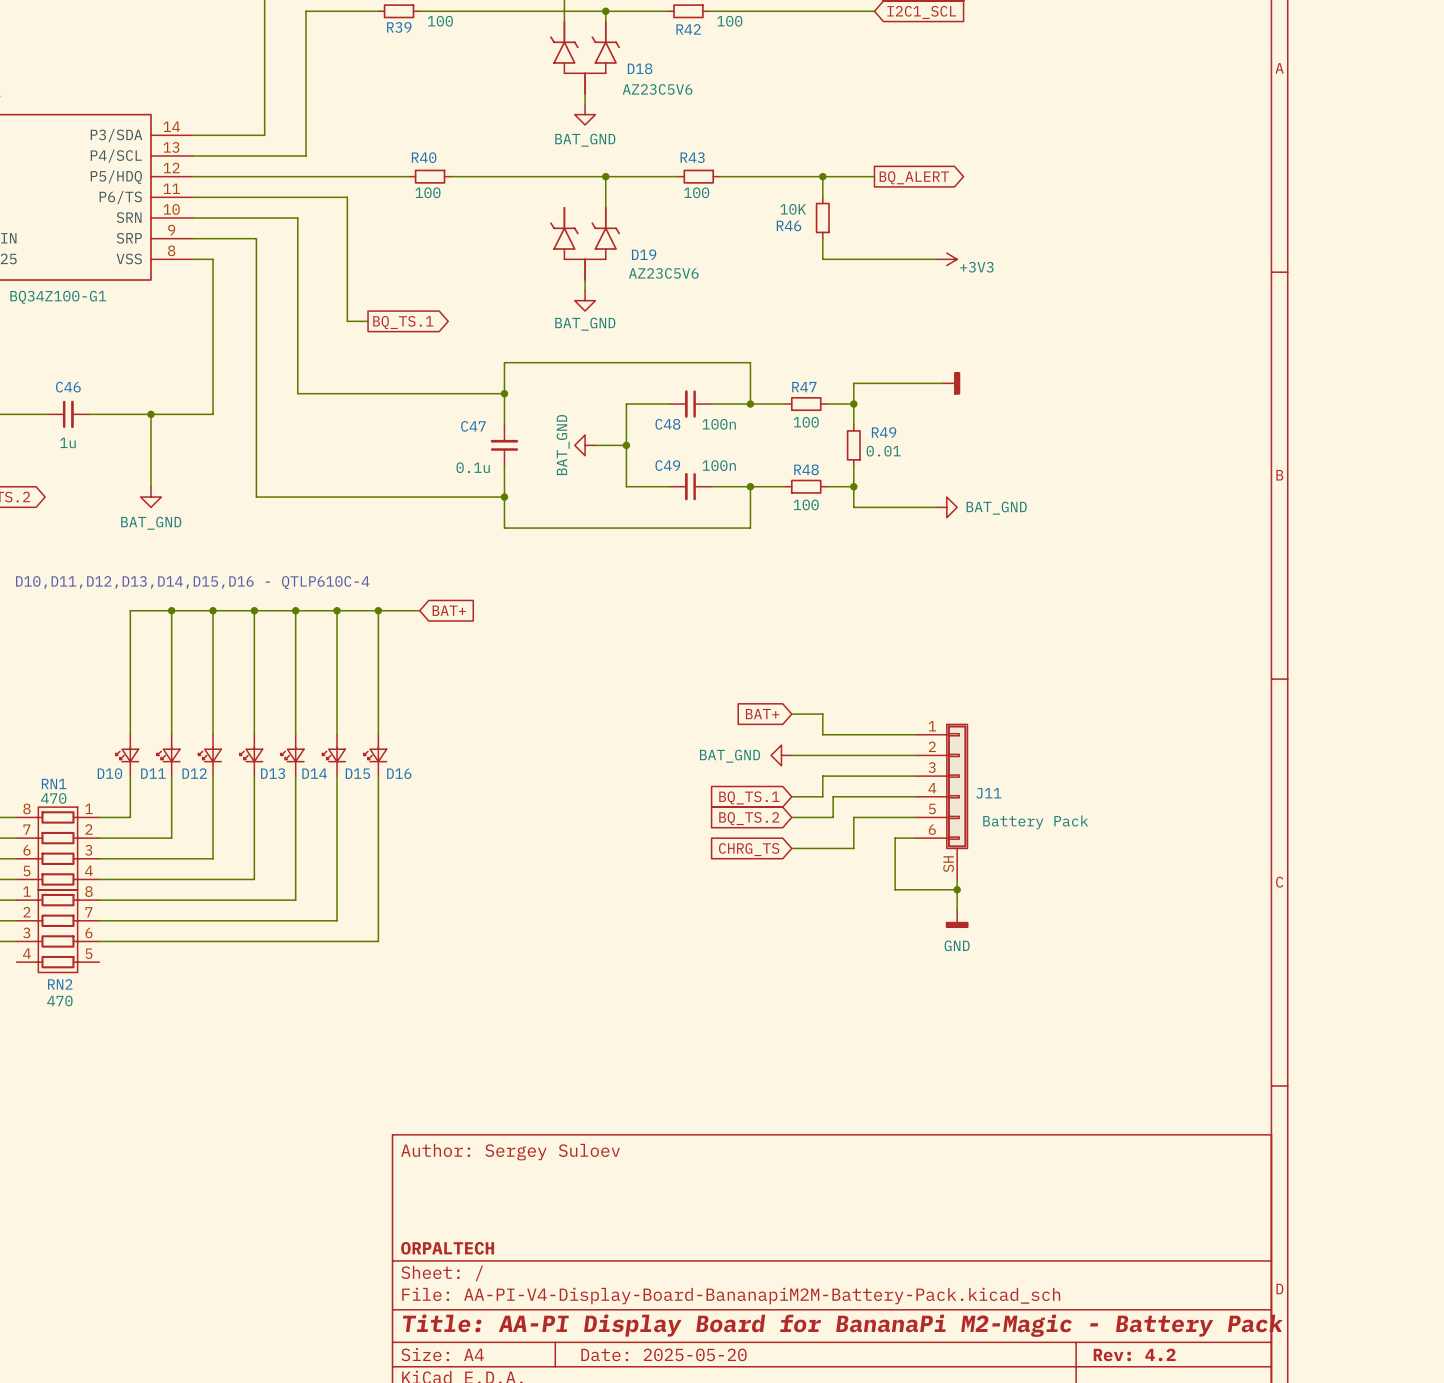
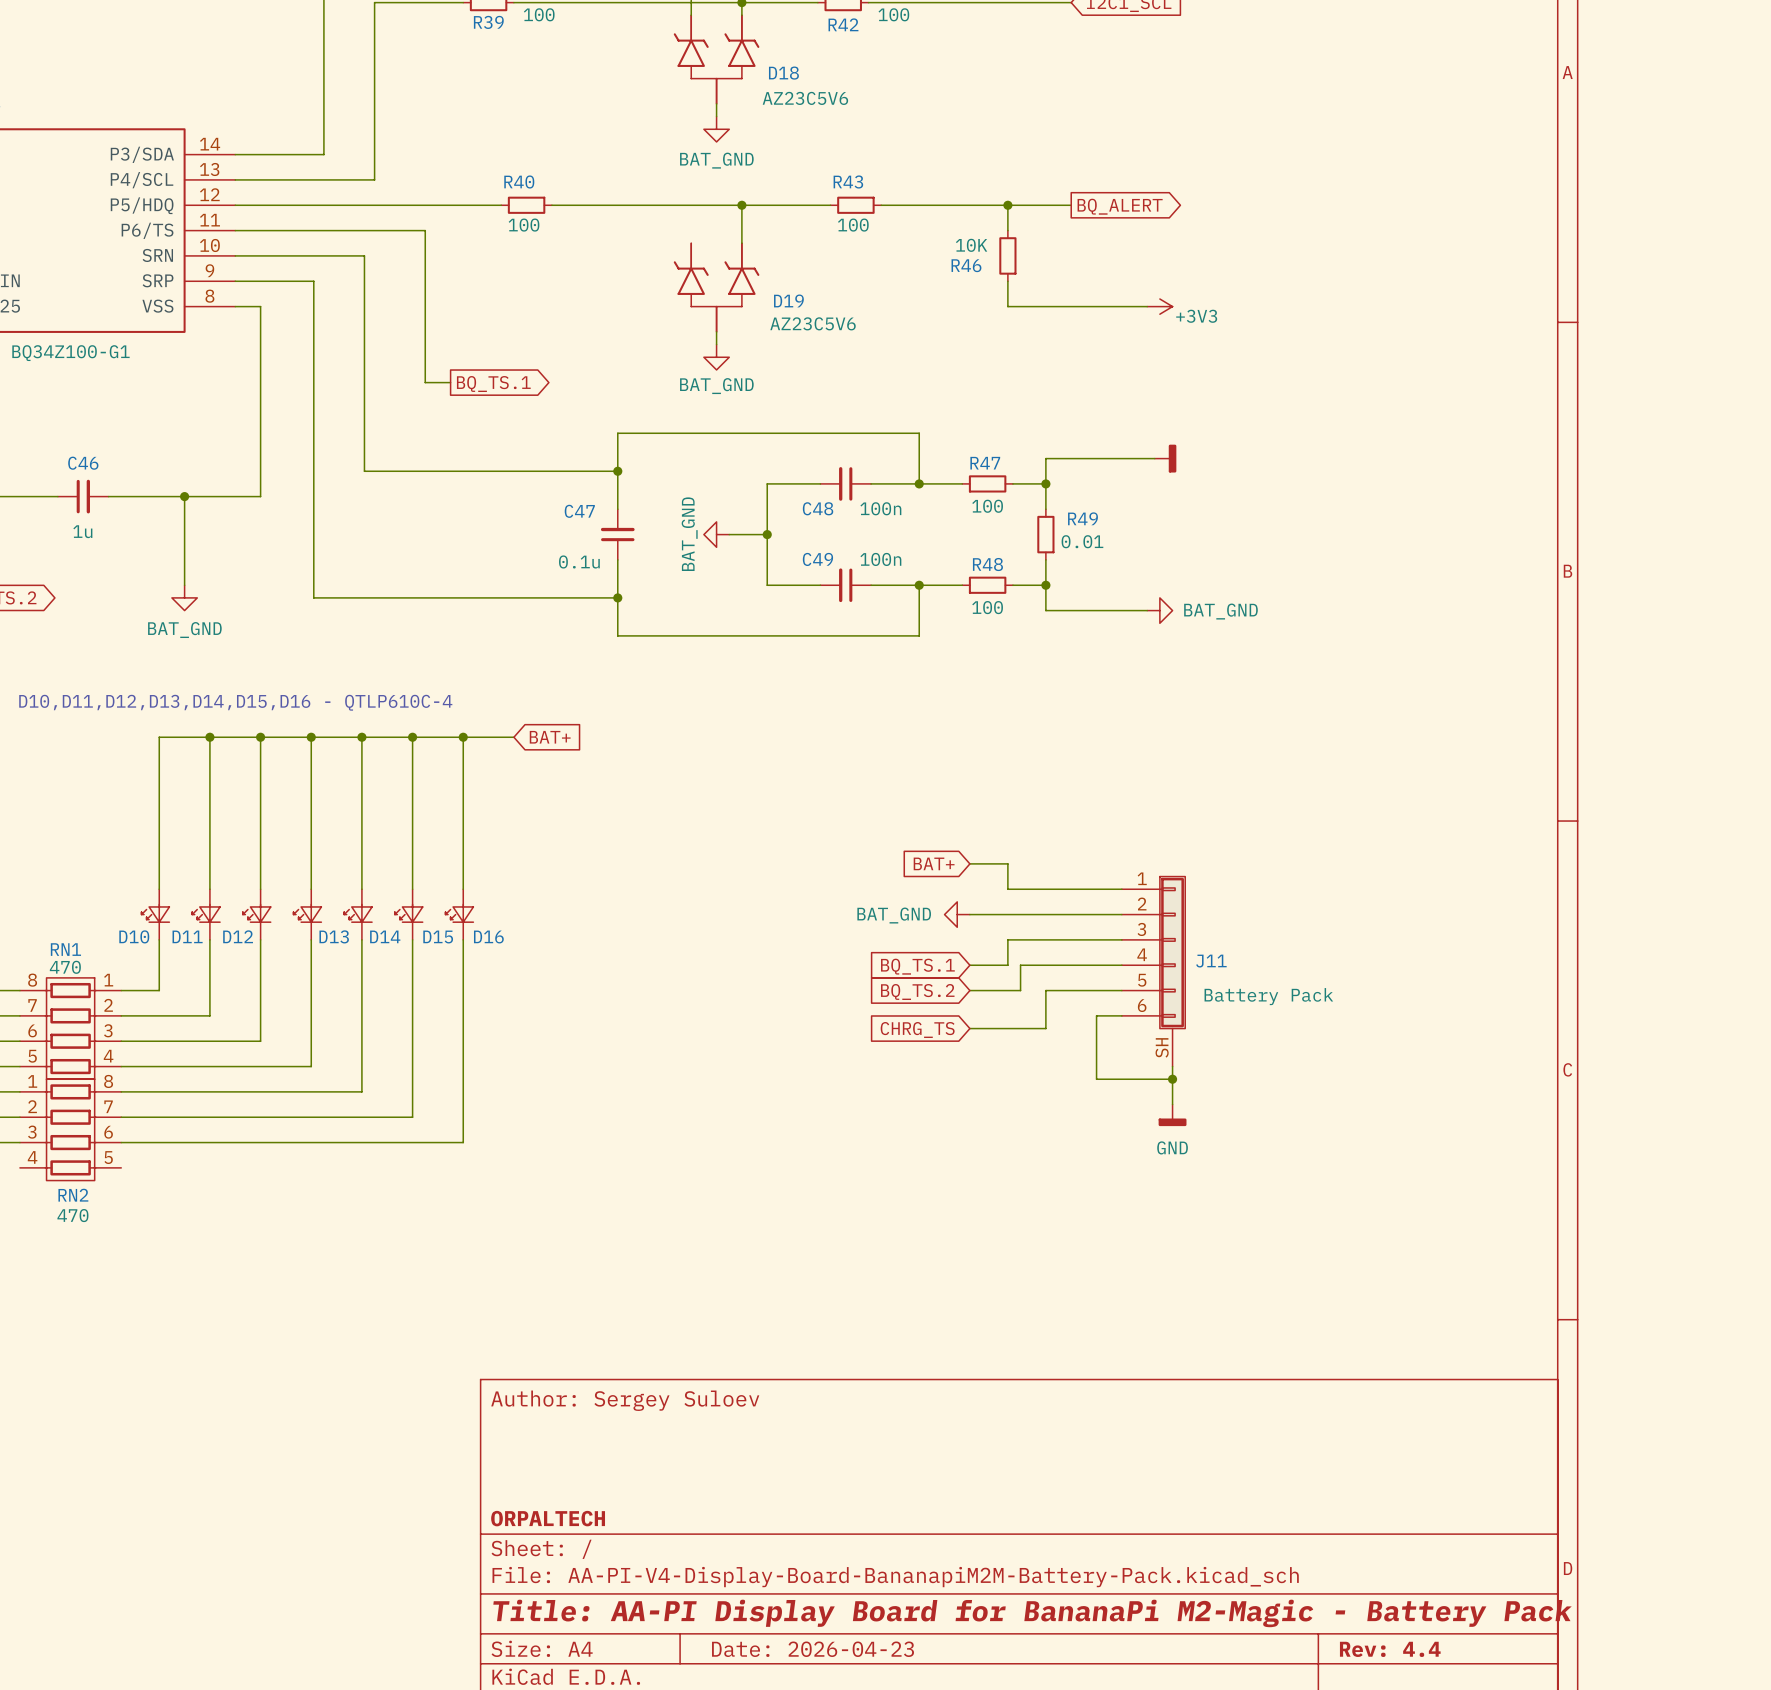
title block: Date: 2025-05-20 (664, 1354) -> Date: 2026-04-23 (813, 1649)
title block: Rev: 4.2 (1134, 1354) -> Rev: 4.4 (1390, 1649)

